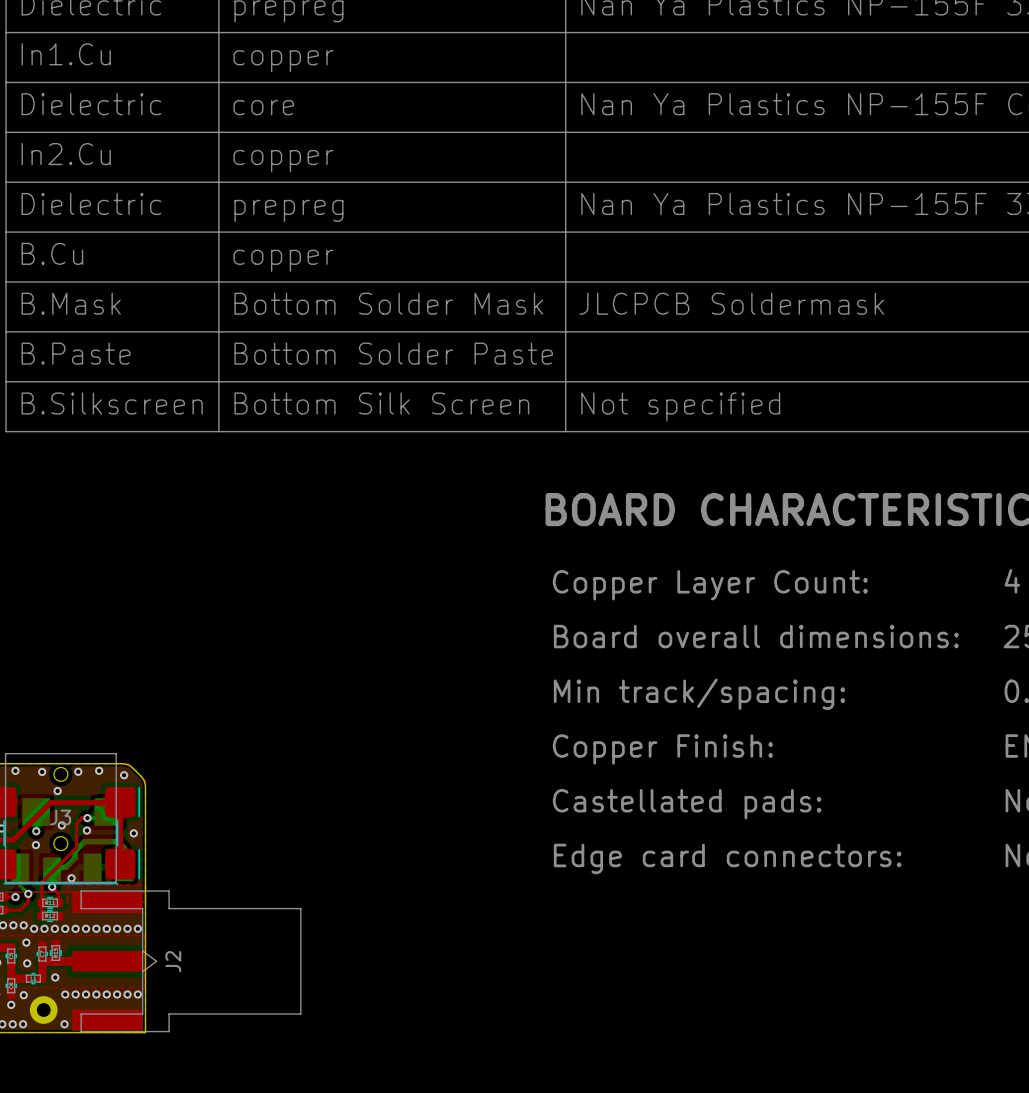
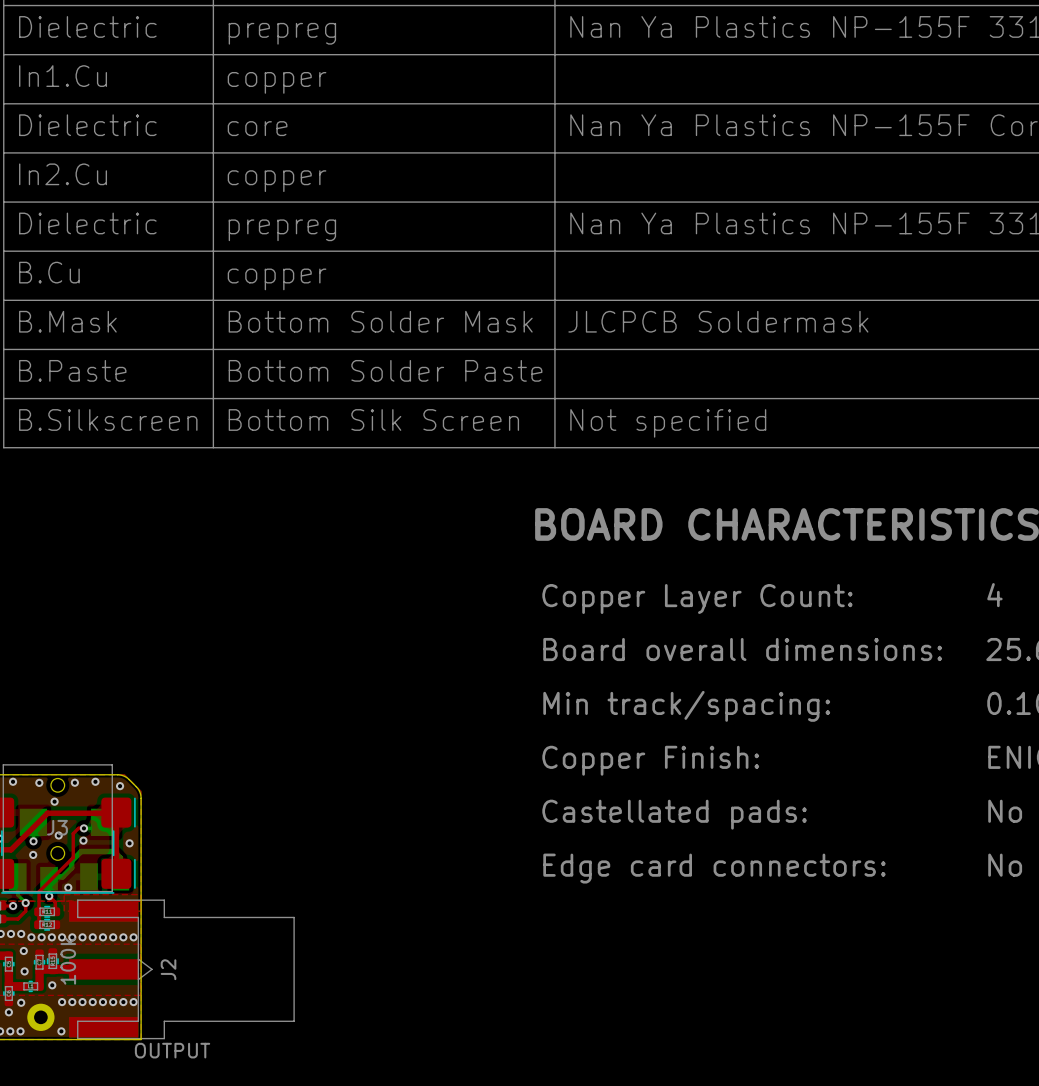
part value: none -> 100k (68, 961)
J2 value: none -> OUTPUT (172, 1050)

